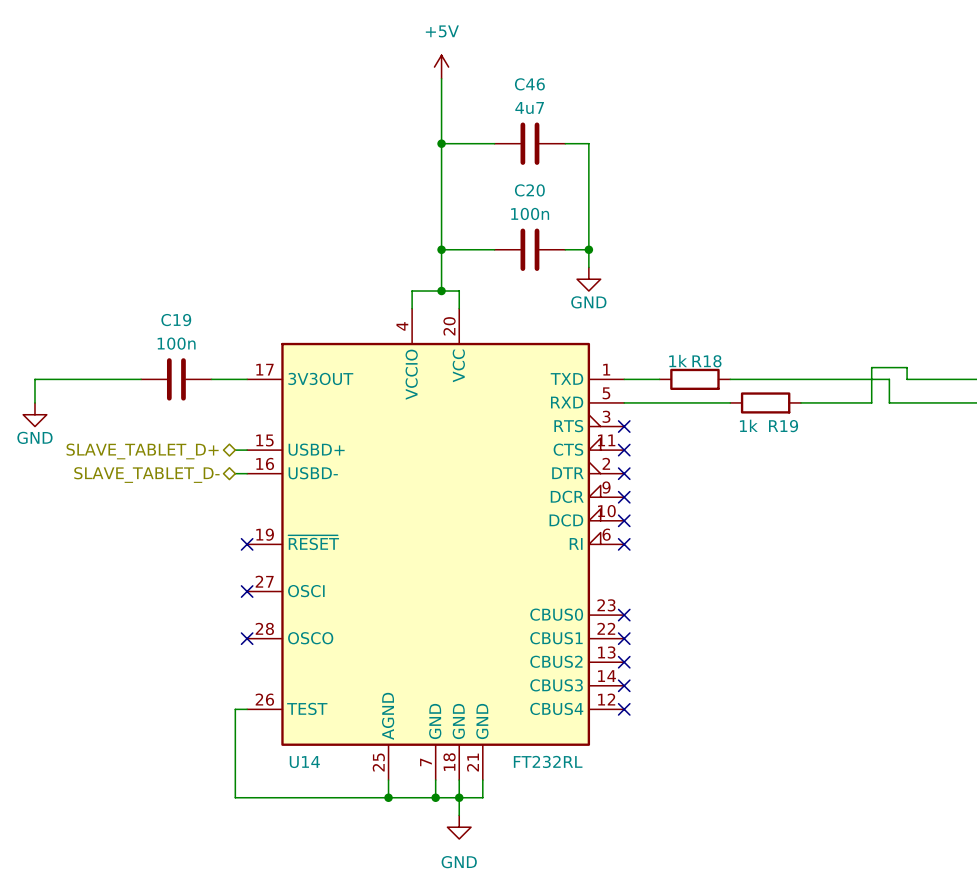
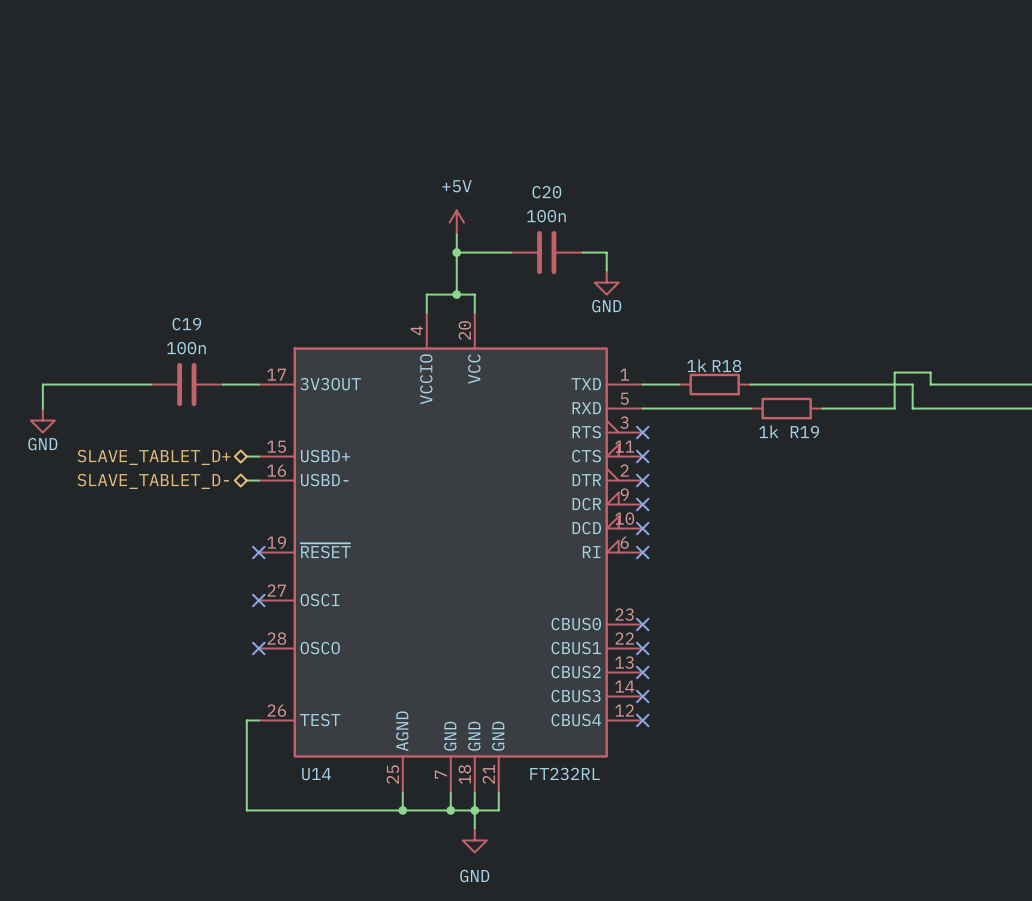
power symbol position: +5V (441, 67) -> +5V (456, 222)
wire: (441, 78) (441, 232) -> none
wire: (441, 143) (494, 143) -> none
junction: (441, 143) -> none
C46: 4u7 (529, 143) -> none
wire: (565, 143) (588, 143) (588, 249) -> none
junction: (588, 249) -> none

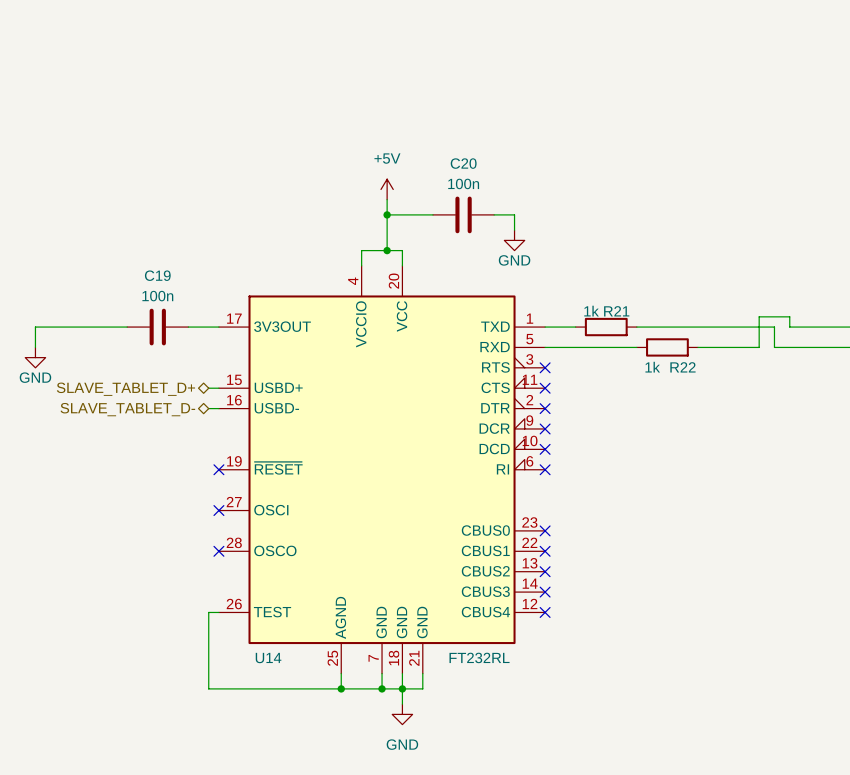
R18 name: R18 (727, 366) -> R21 (616, 311)
R19 name: R19 (804, 431) -> R22 (682, 367)

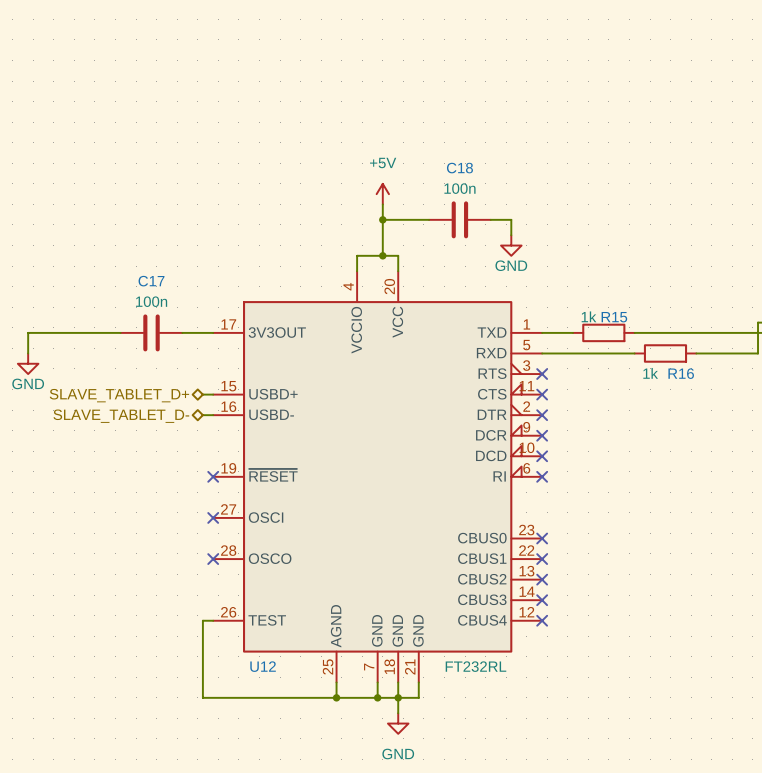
C20 name: C20 (463, 163) -> C18 (459, 168)
C19 name: C19 (157, 275) -> C17 (151, 281)
R21 name: R21 (616, 311) -> R15 (614, 317)
R22 name: R22 (682, 367) -> R16 (681, 373)
U14 name: U14 (268, 658) -> U12 (263, 666)

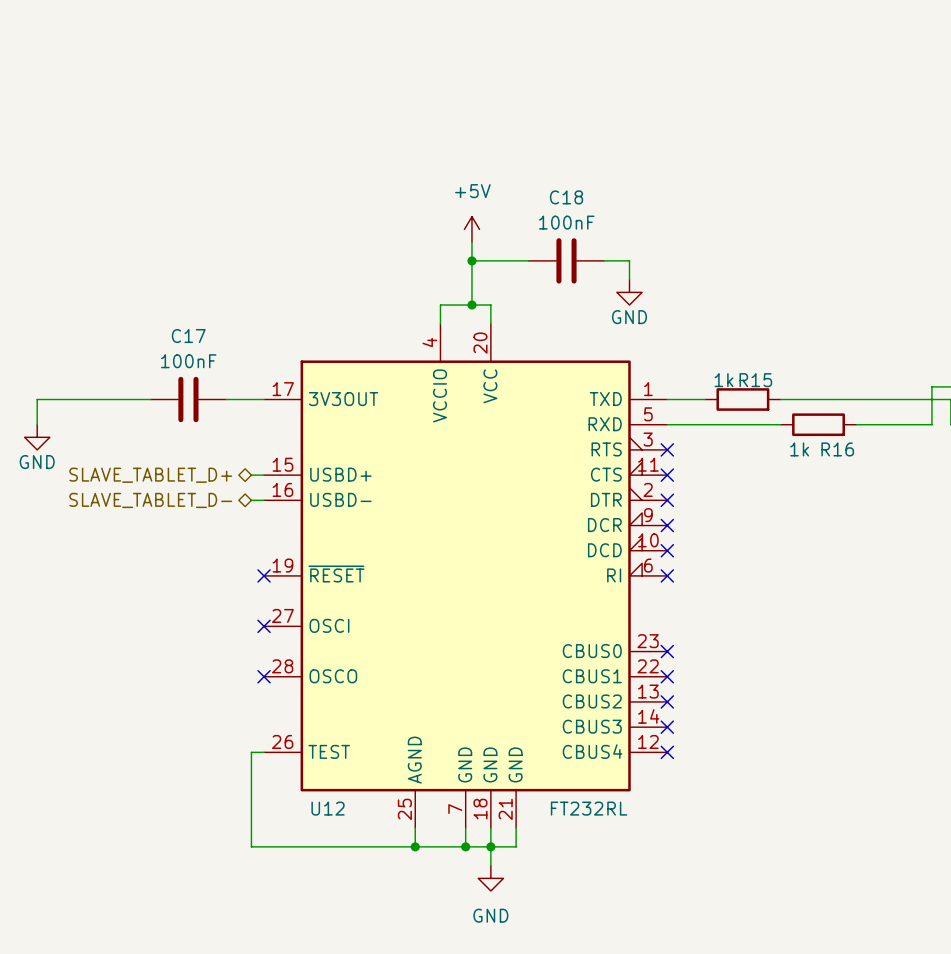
C18 value: 100n (459, 188) -> 100nF (566, 222)
C17 value: 100n (151, 301) -> 100nF (188, 361)

